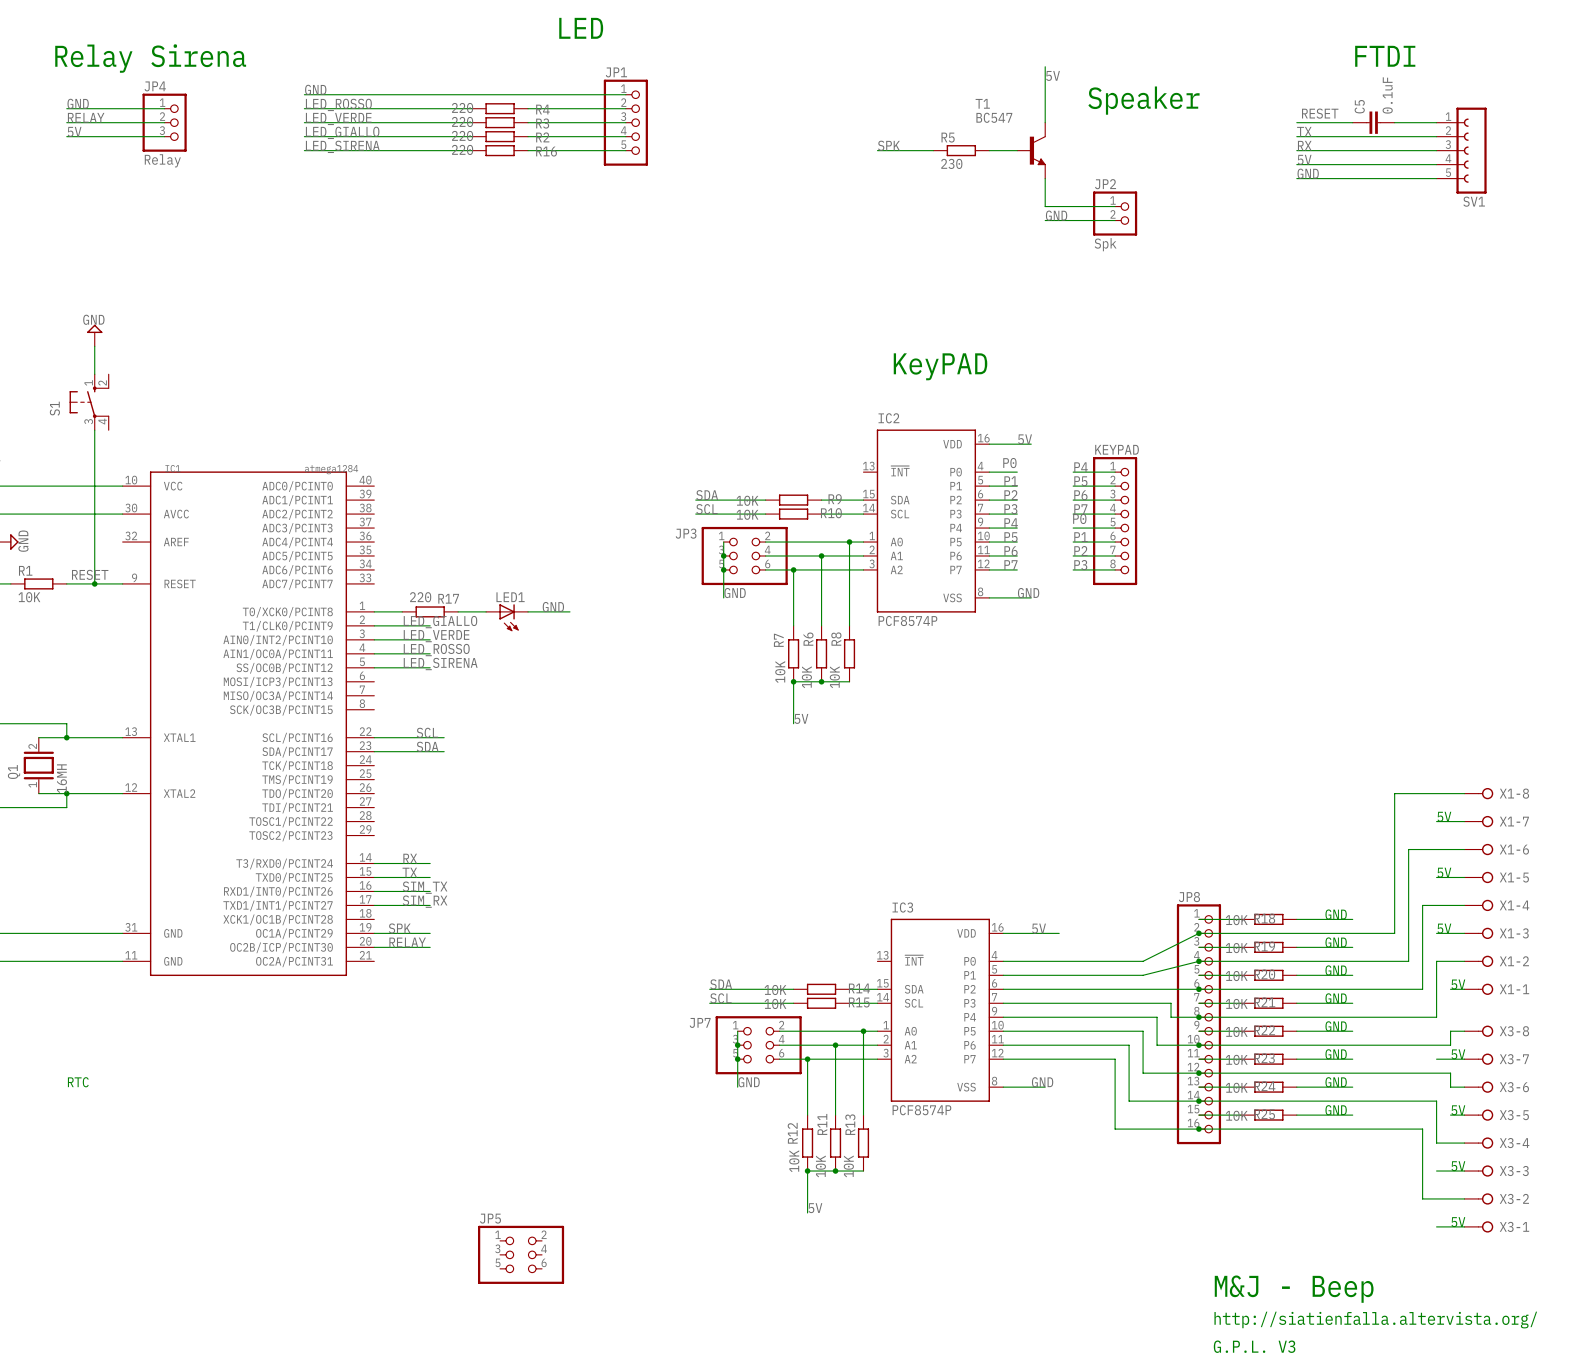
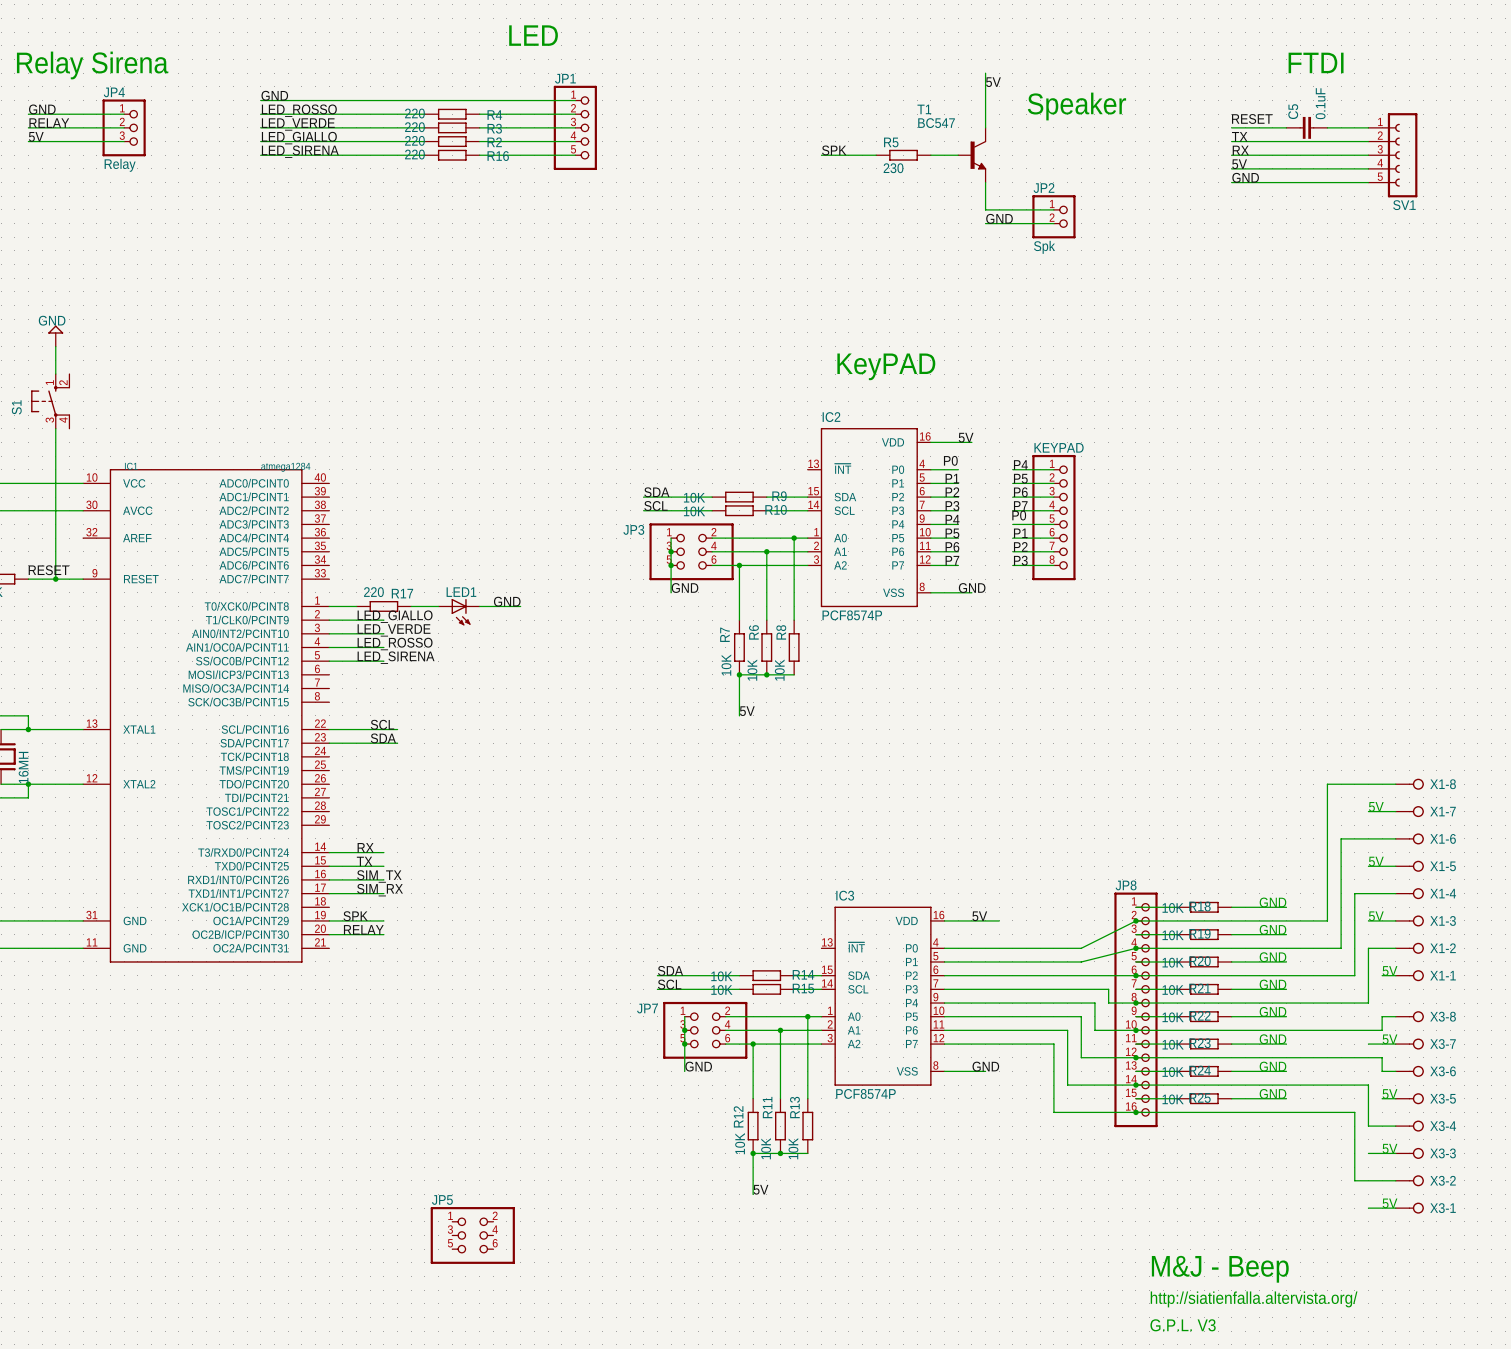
text: RTC (78, 1082) -> none

